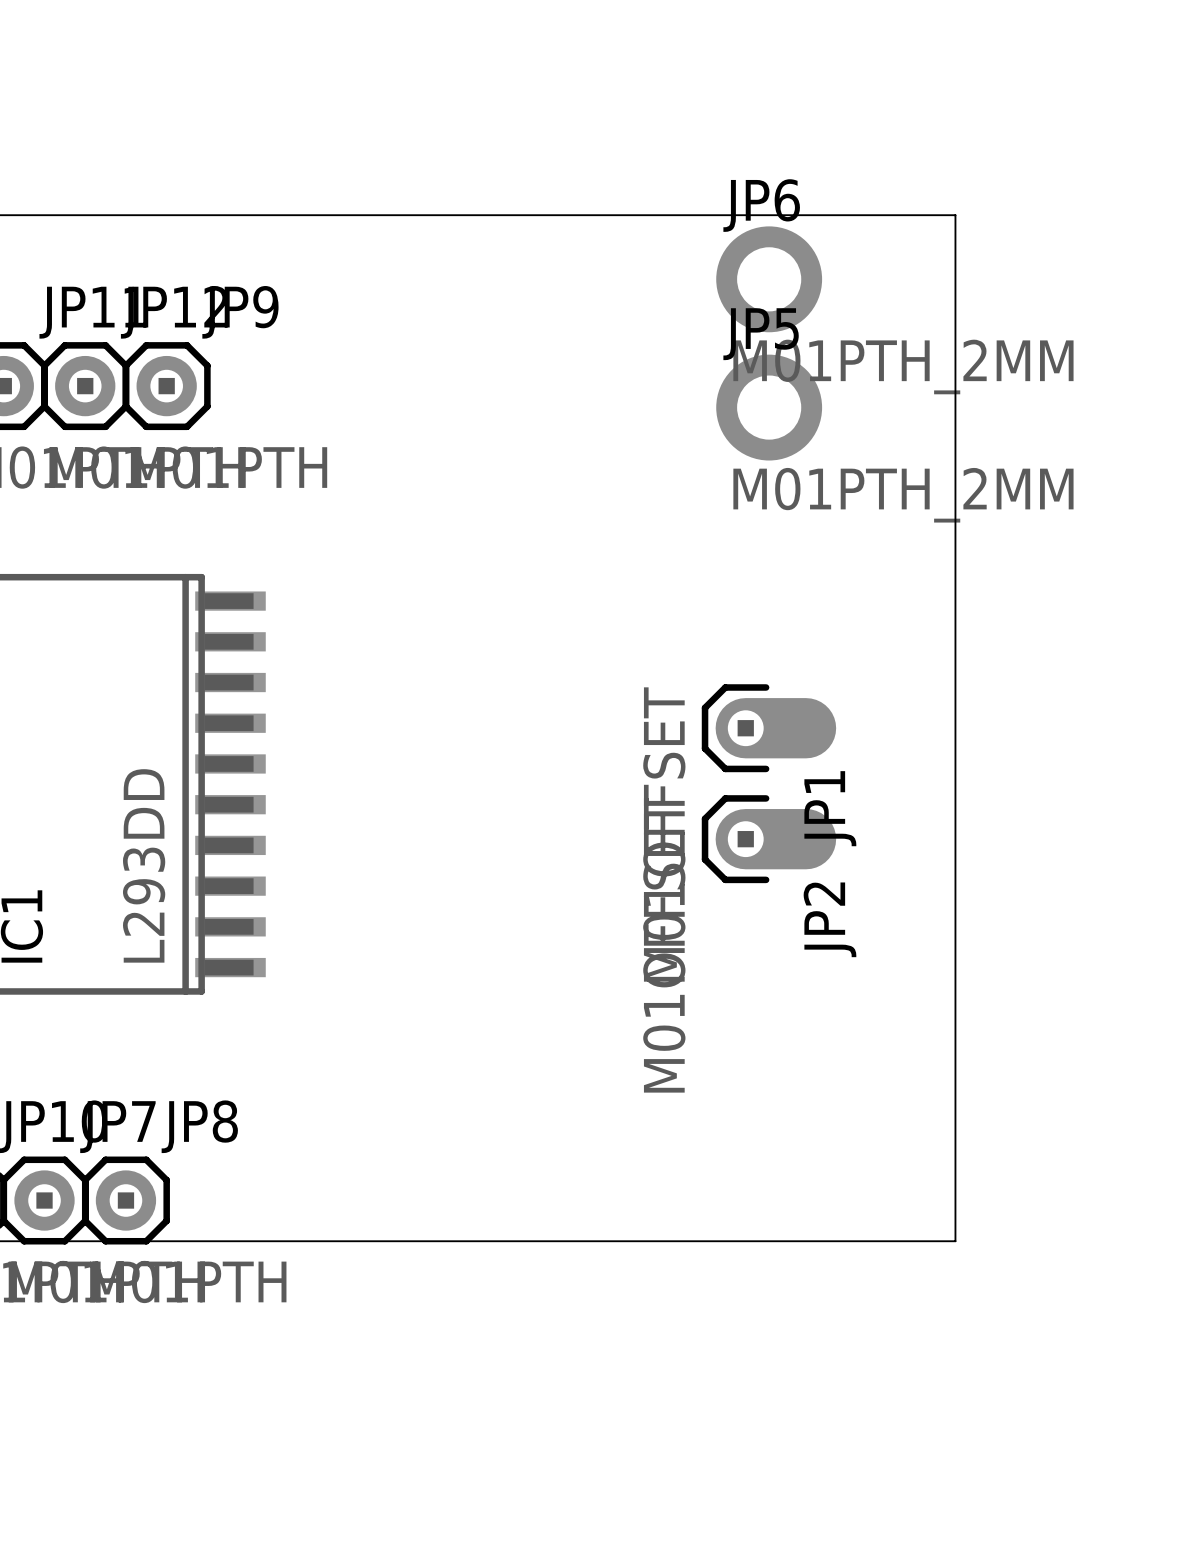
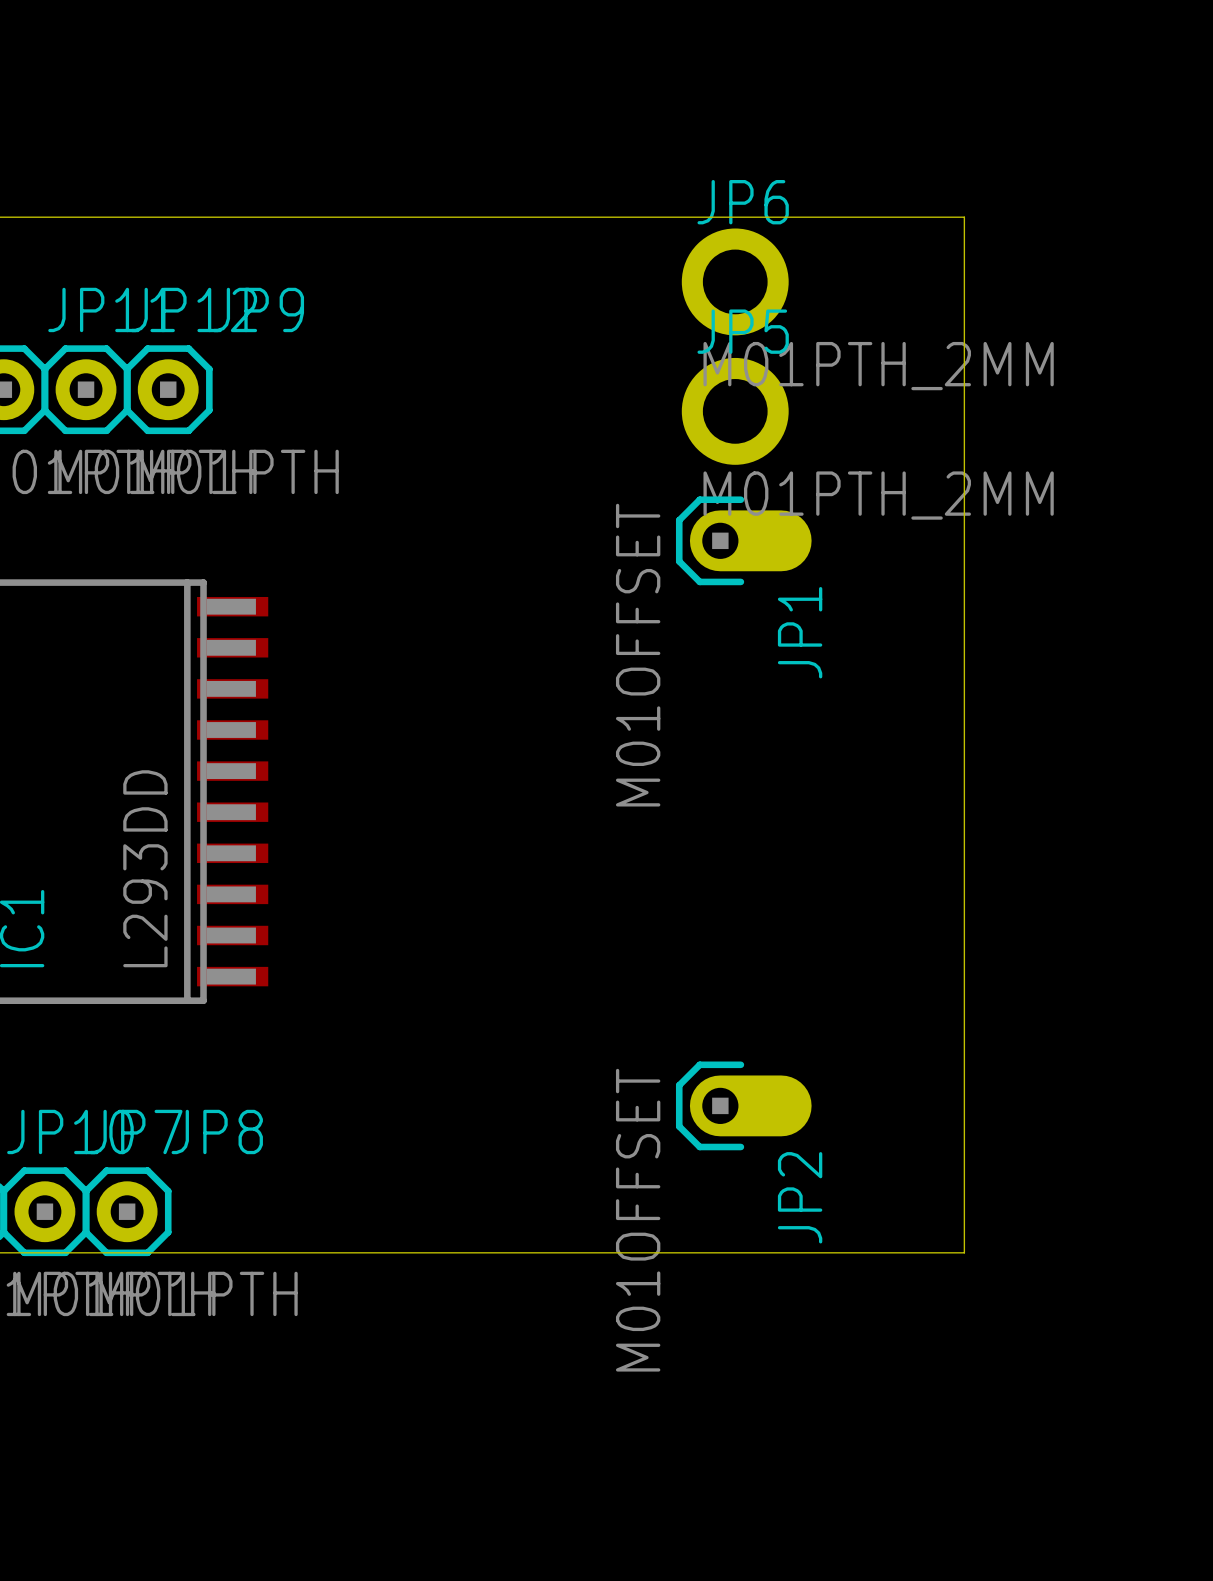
JP6 position: (769, 279) -> (735, 281)
JP5 position: (769, 407) -> (735, 411)
JP1 position: (768, 728) -> (743, 540)
JP2 position: (768, 839) -> (743, 1105)

